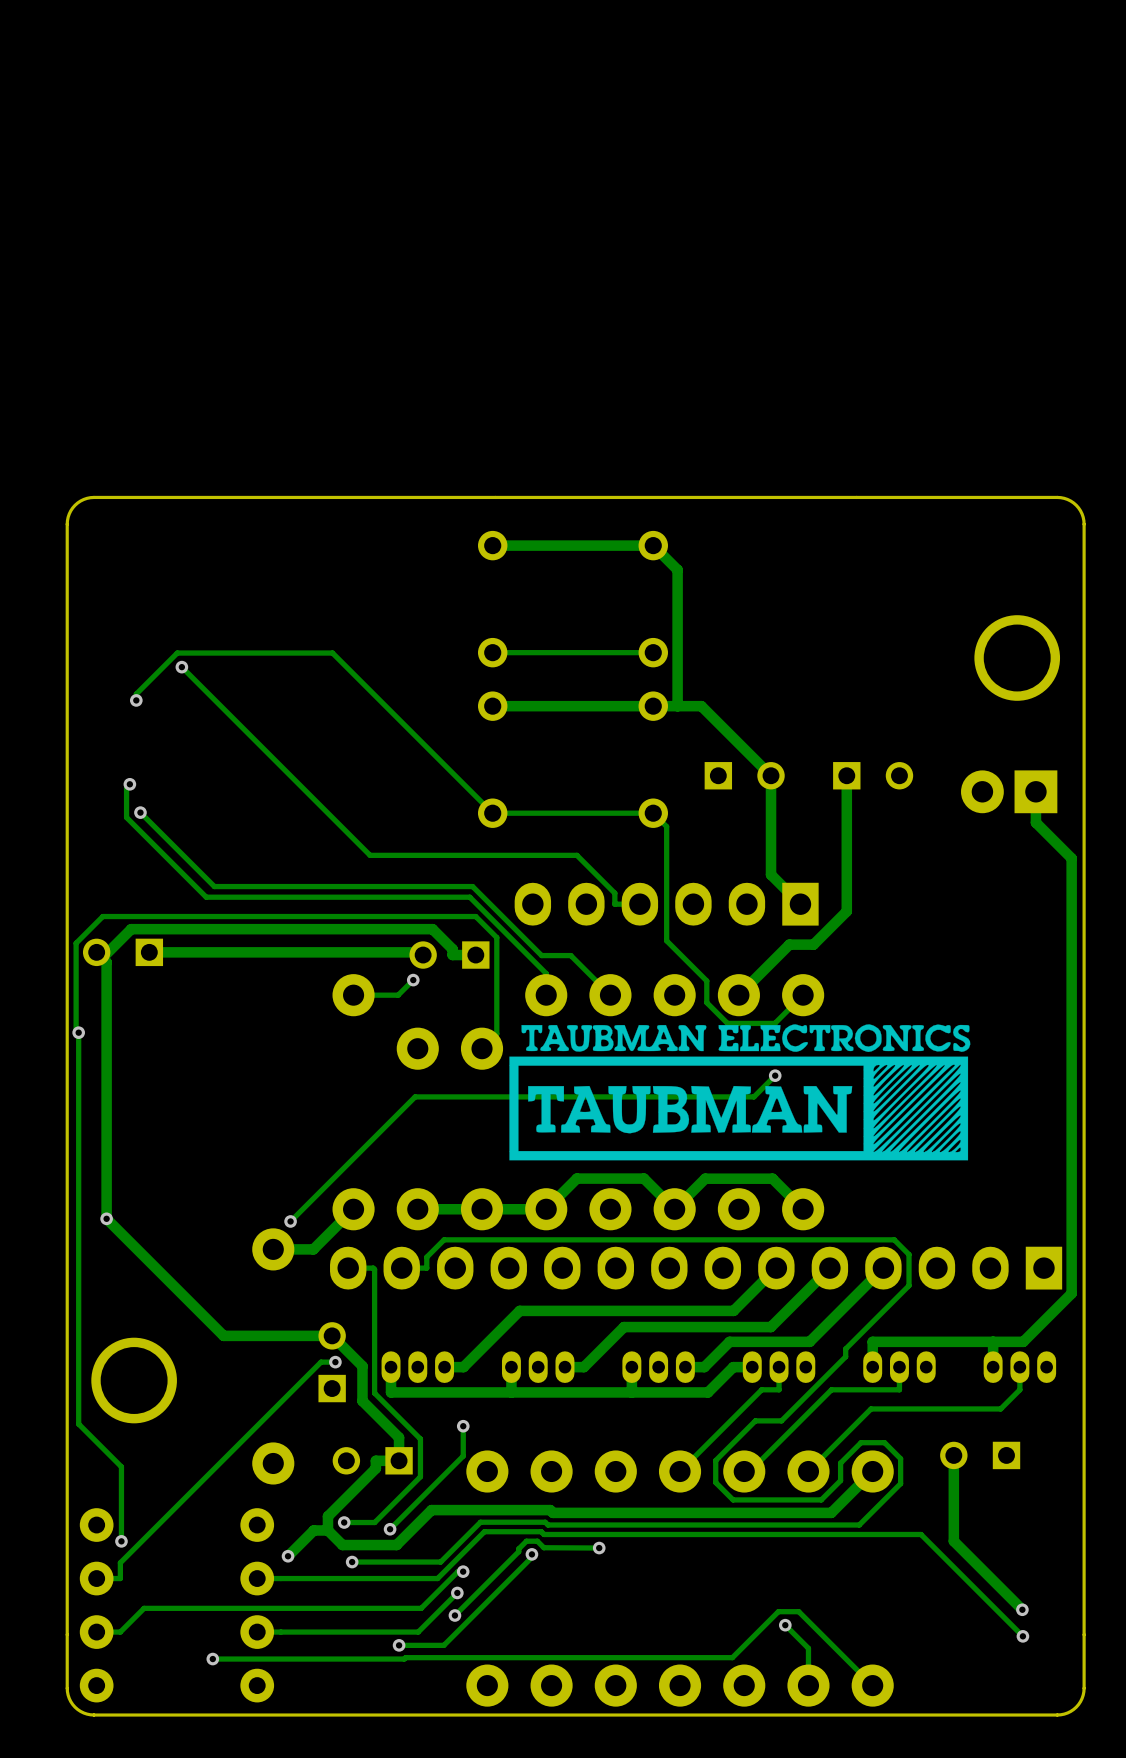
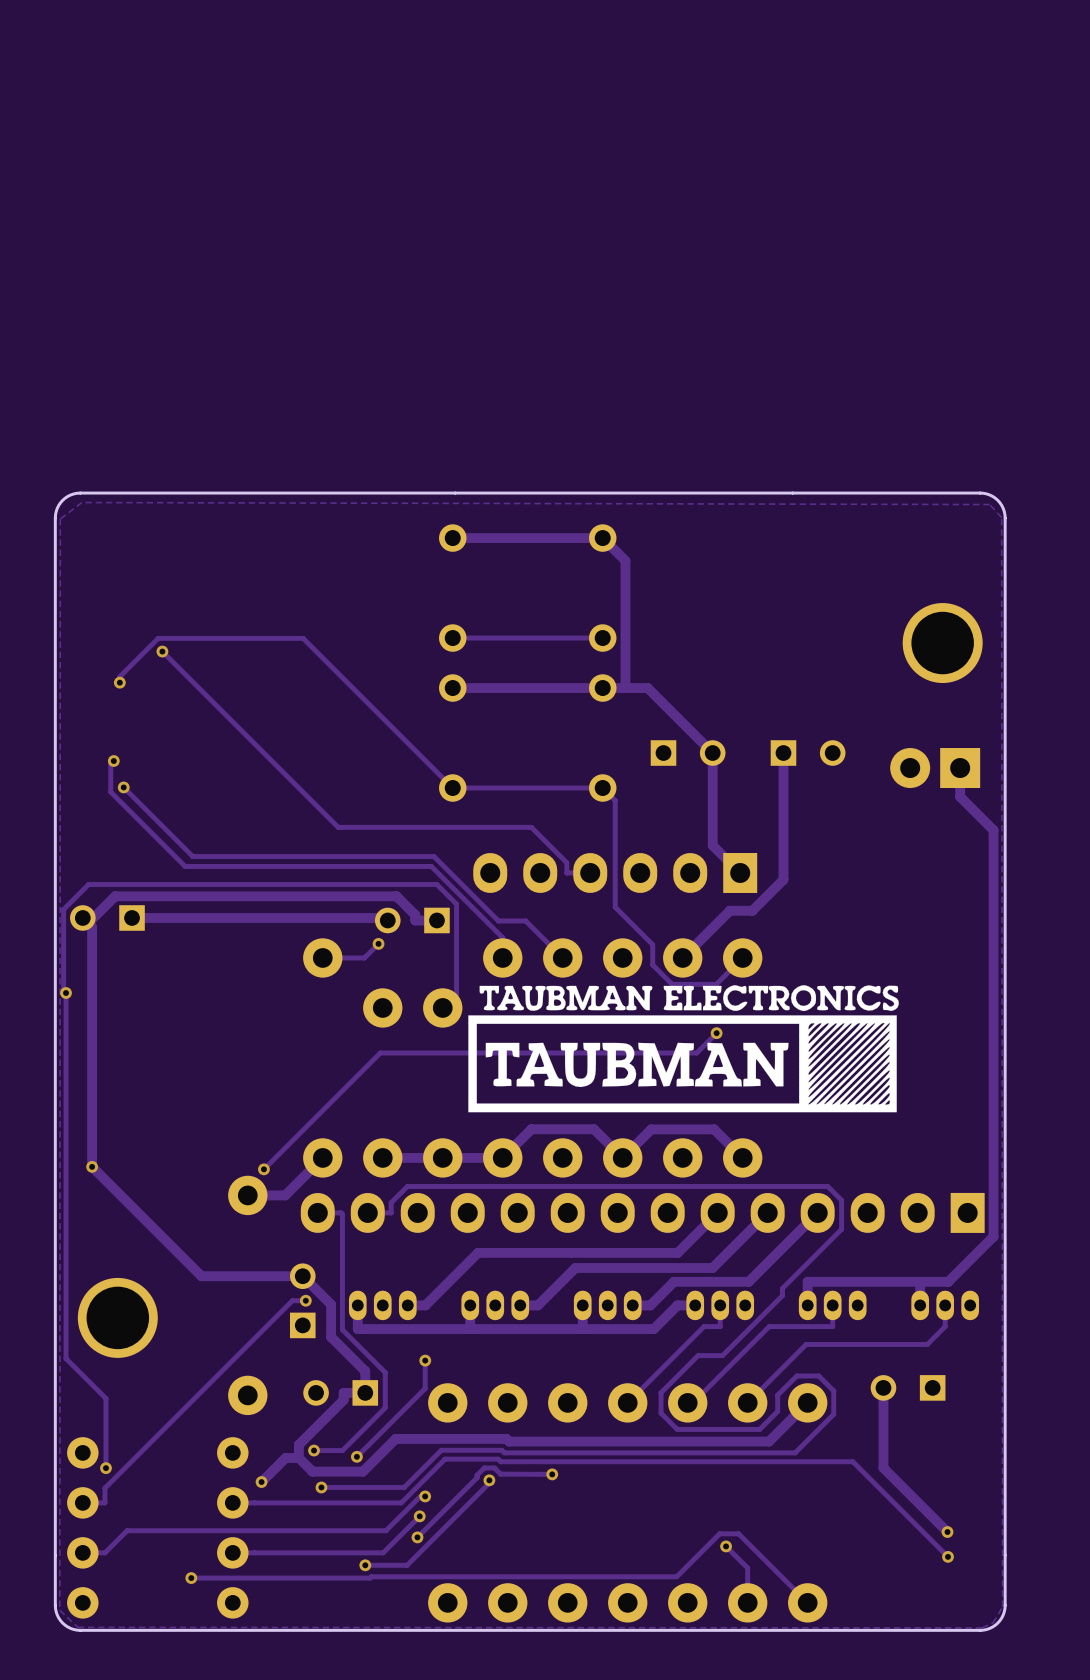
zone outline: none -> (81, 502) (989, 504) (1001, 517) (1002, 1606) (993, 1622) (982, 1627) (77, 1627) (59, 1610) (60, 519) (81, 502)

